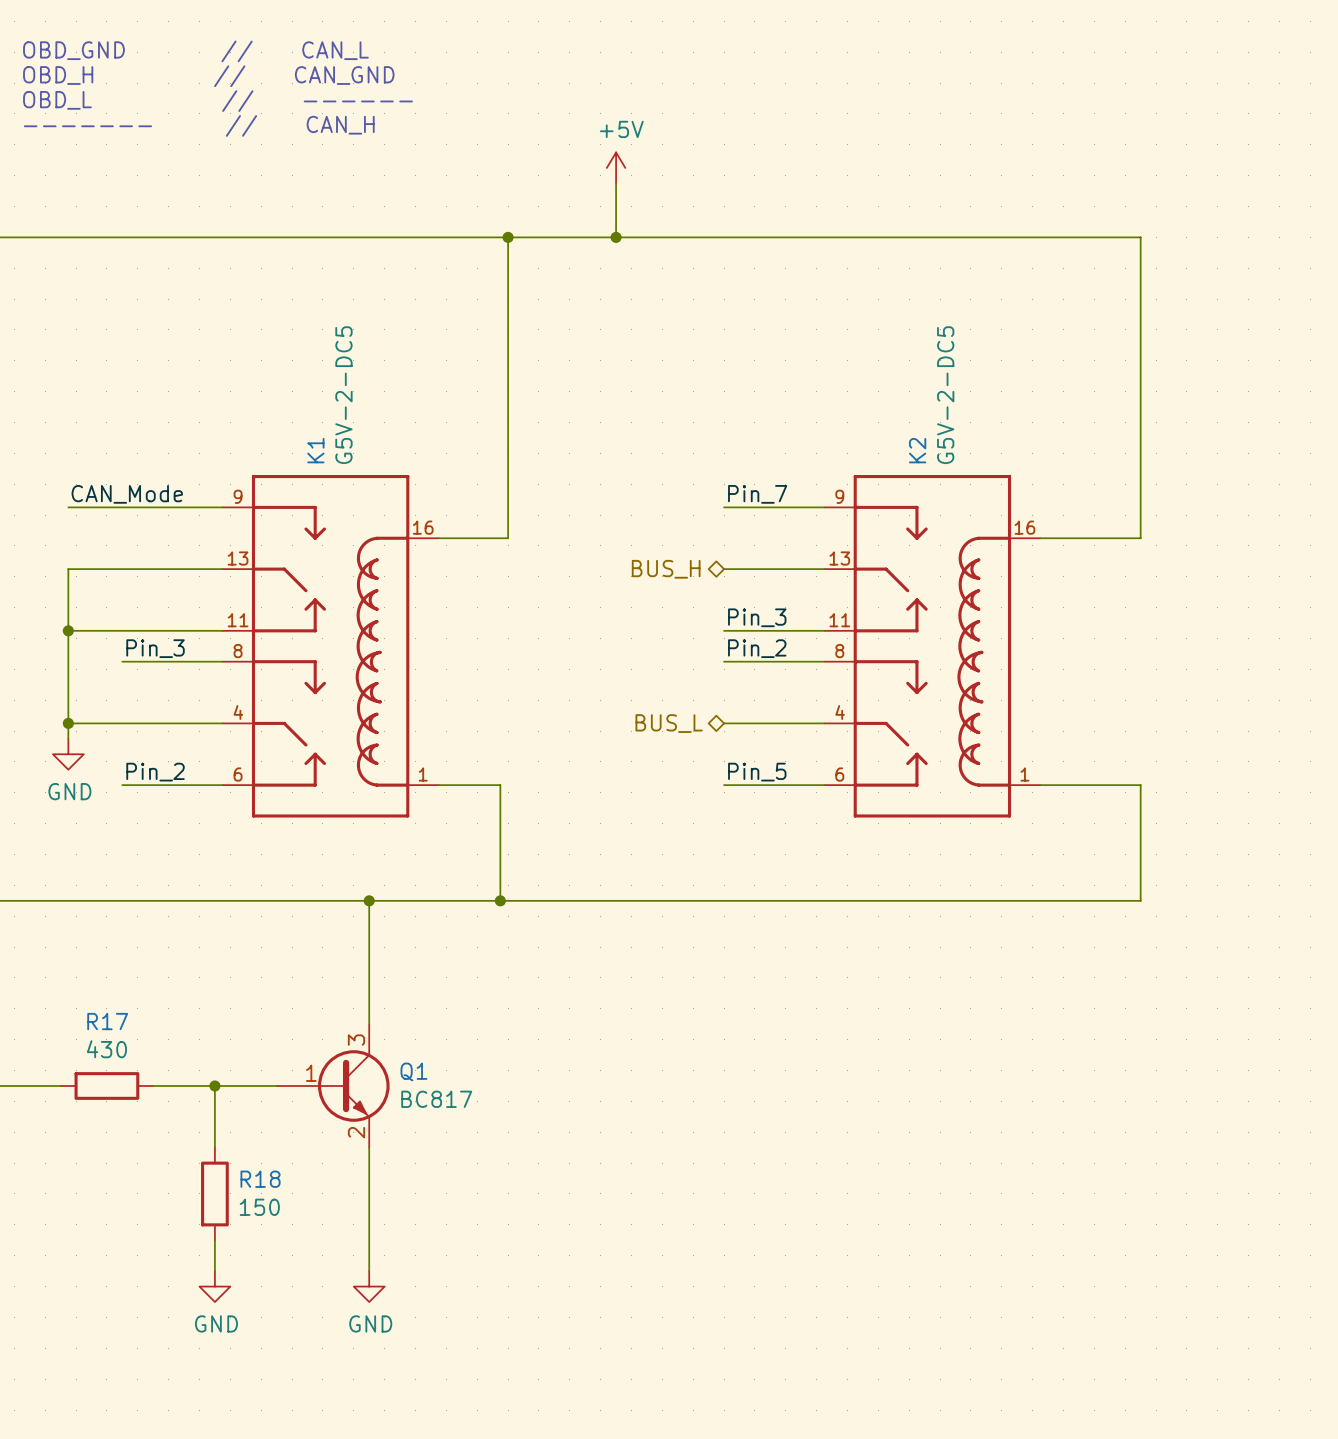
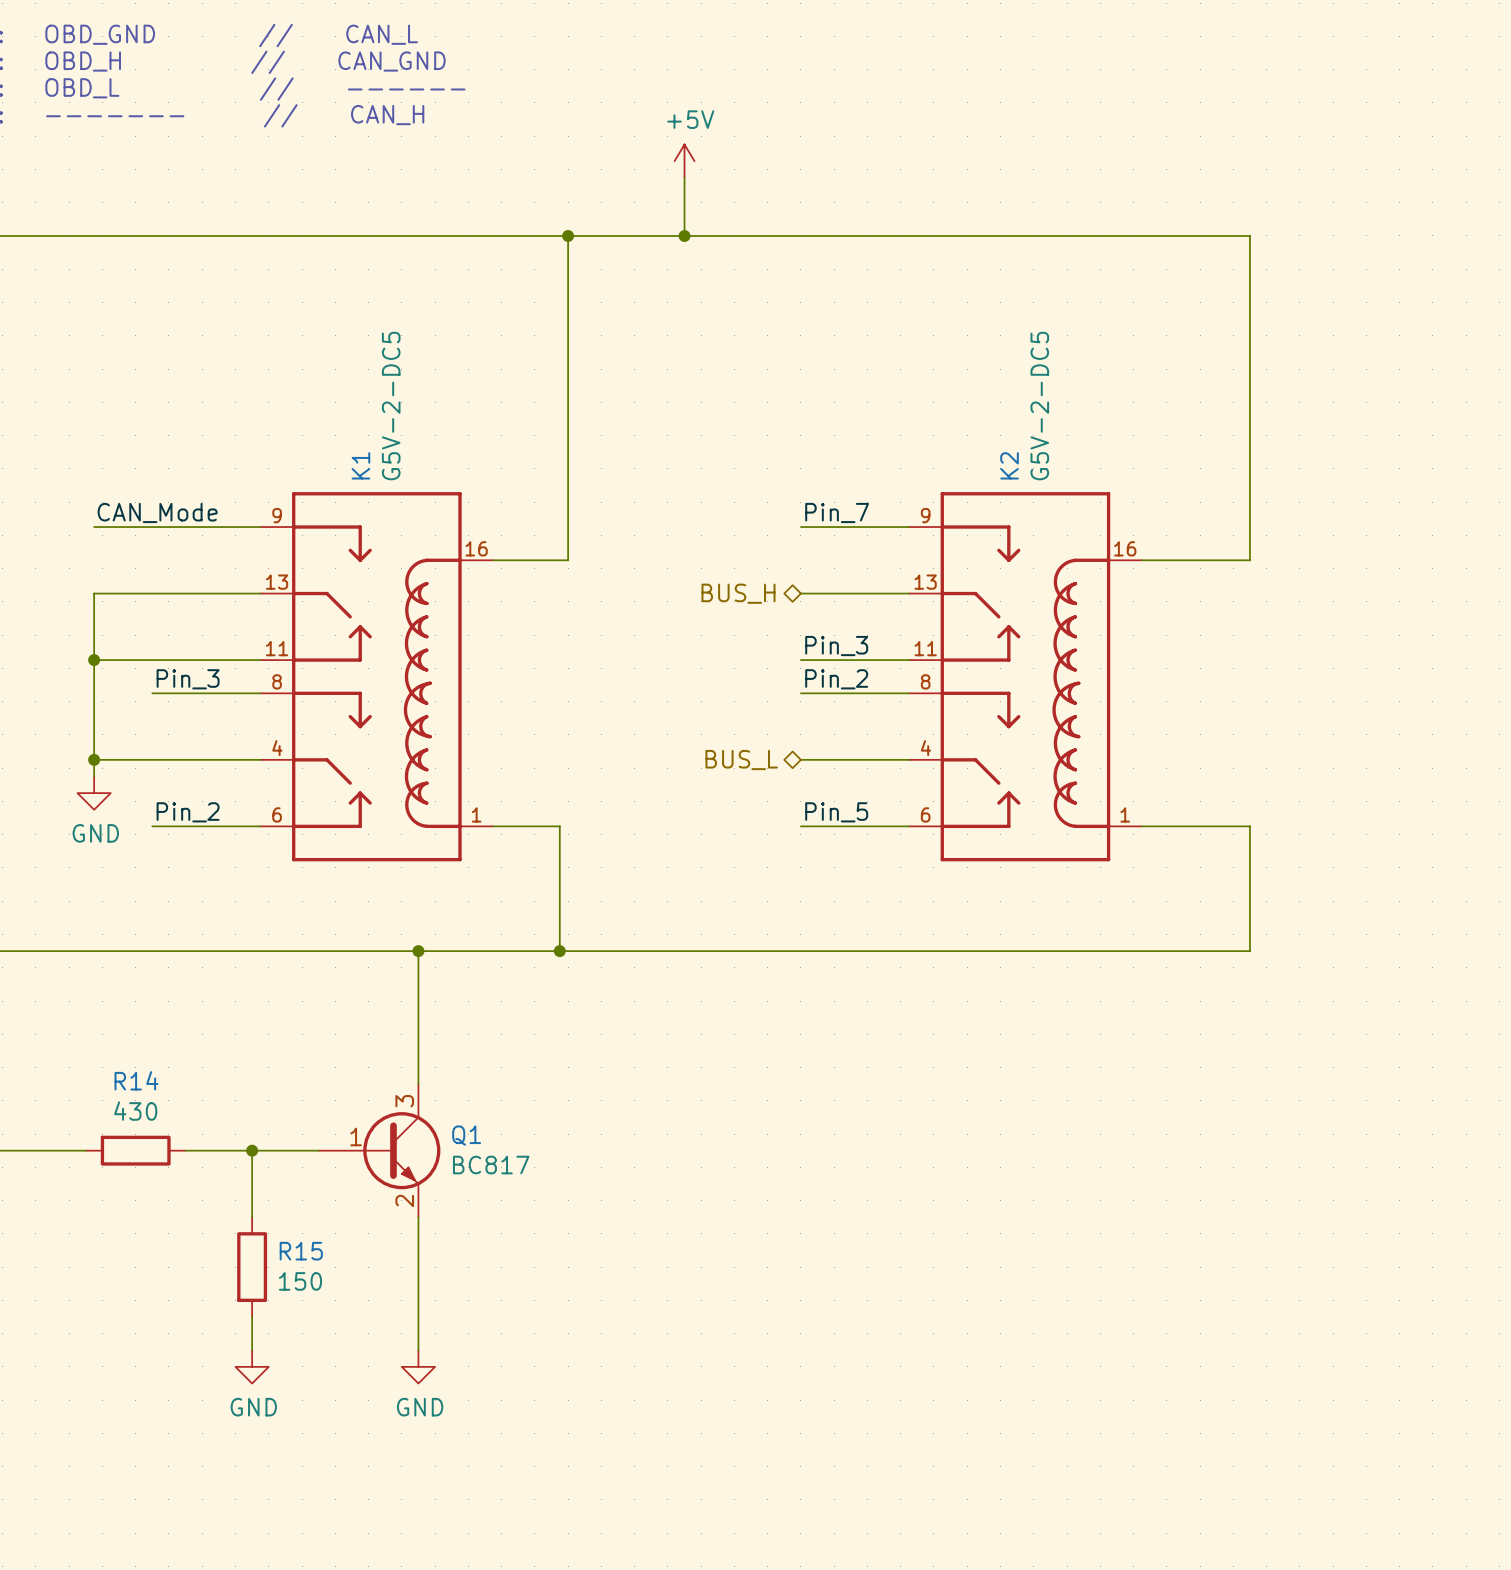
R17 name: R17 (107, 1021) -> R14 (136, 1080)
R18 name: R18 (260, 1179) -> R15 (301, 1251)

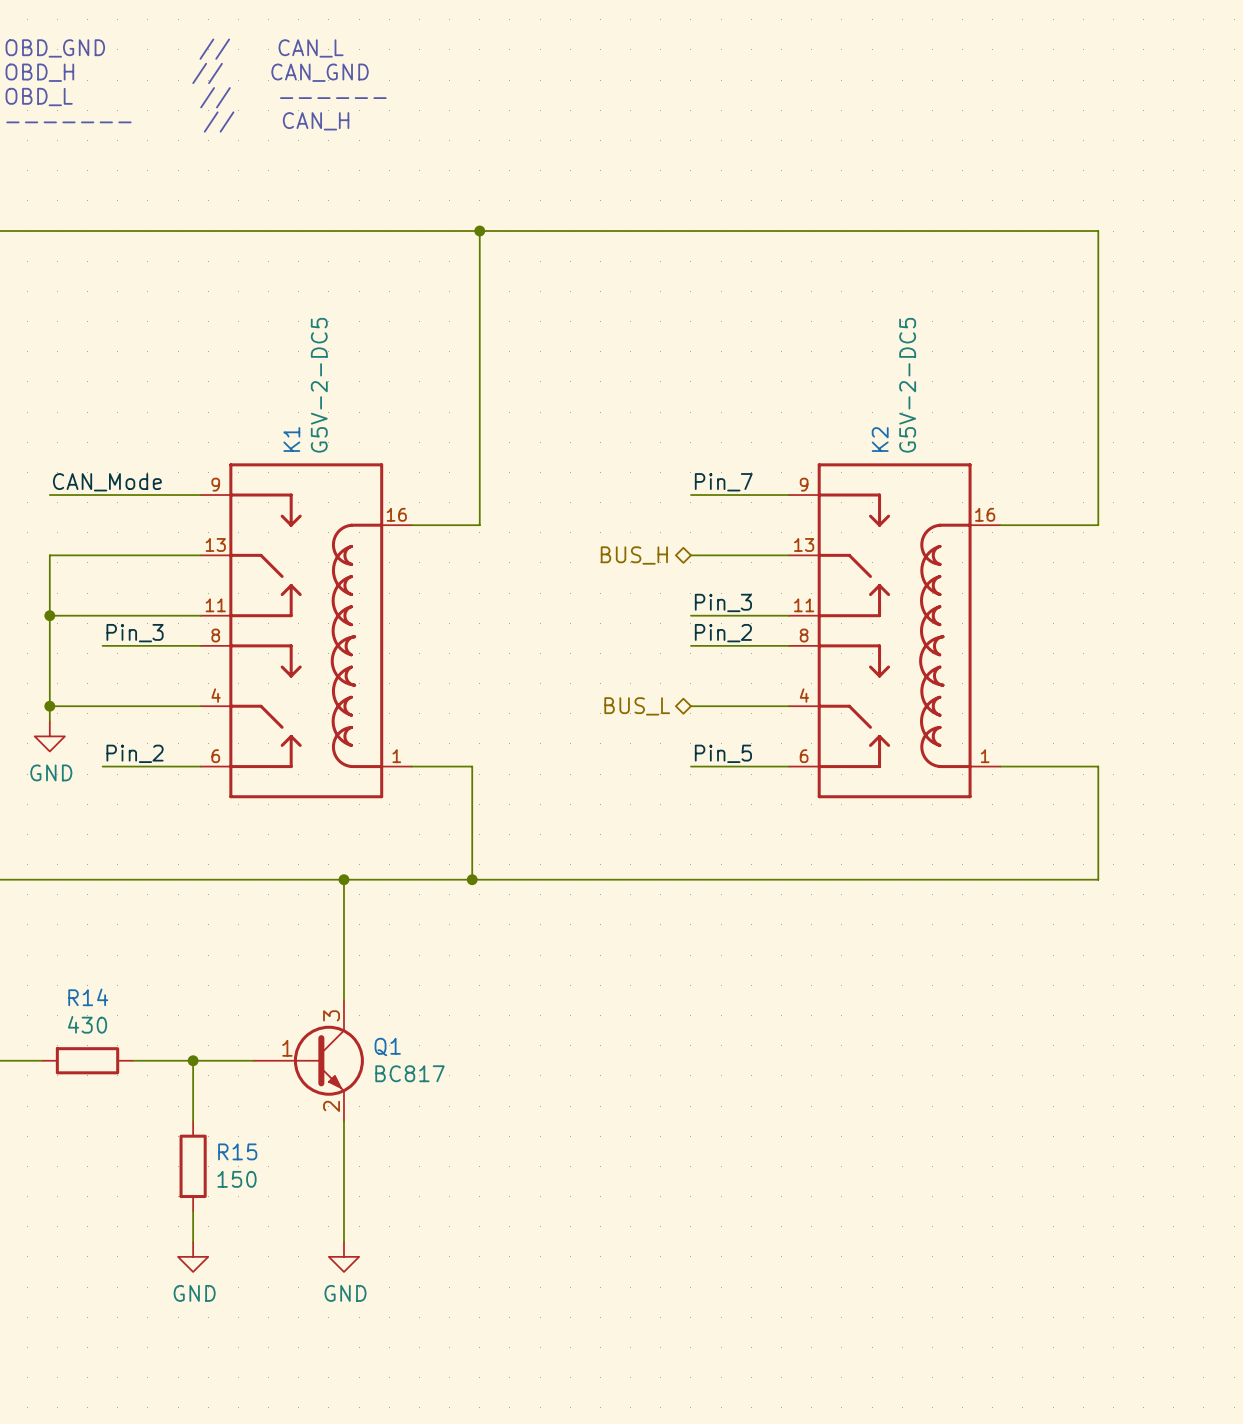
power symbol: +5V (684, 161) -> none
wire: (684, 177) (684, 235) -> none
junction: (684, 235) -> none

